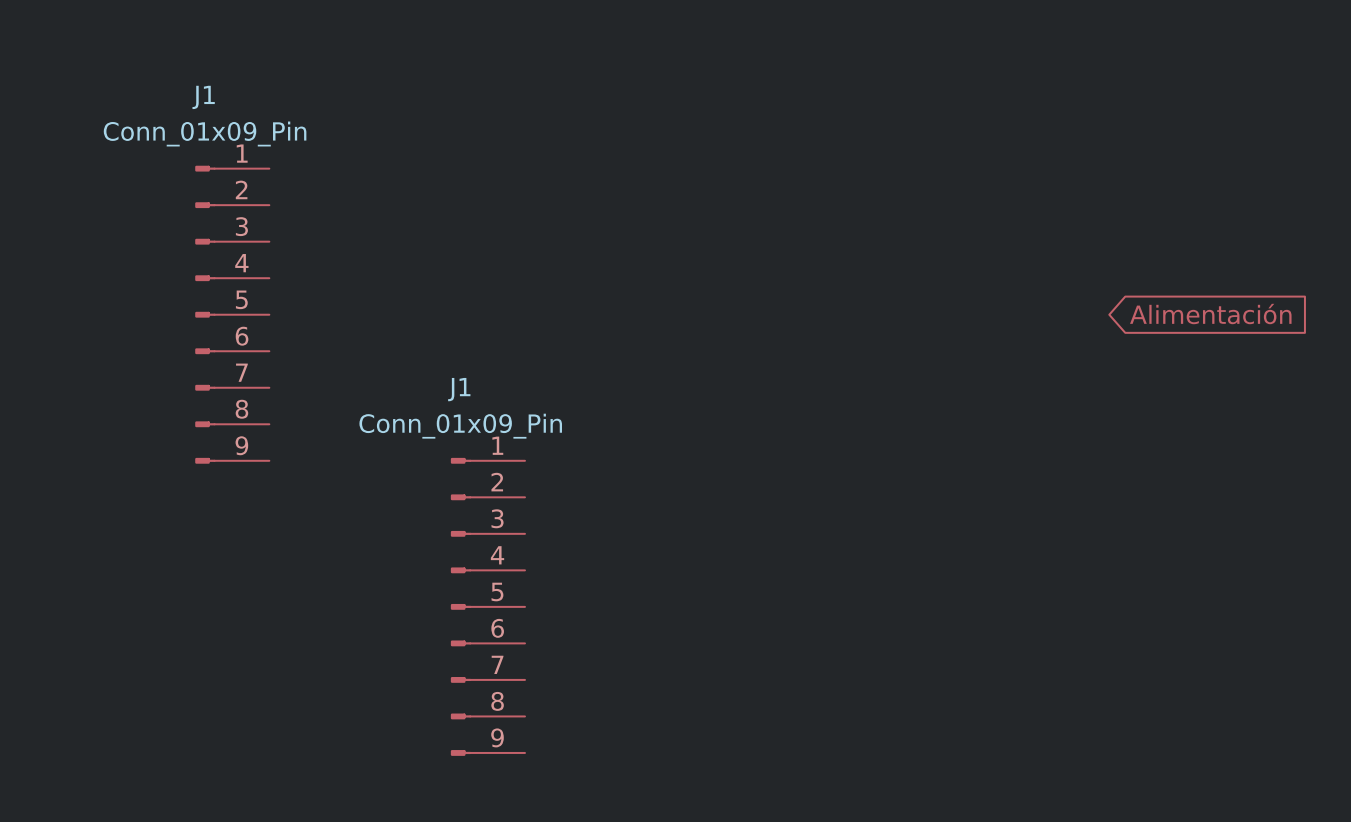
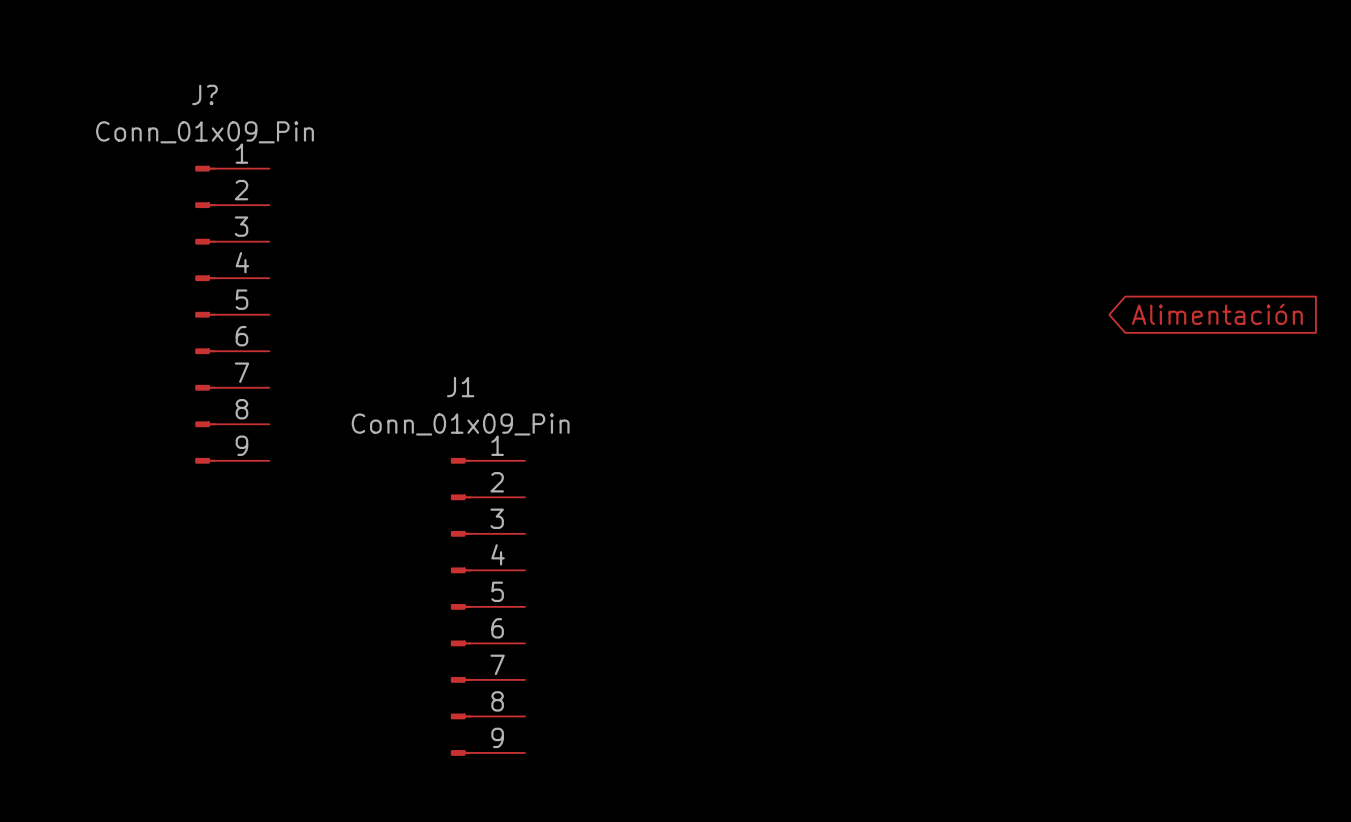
J1 name: J1 (203, 97) -> J? (205, 94)

